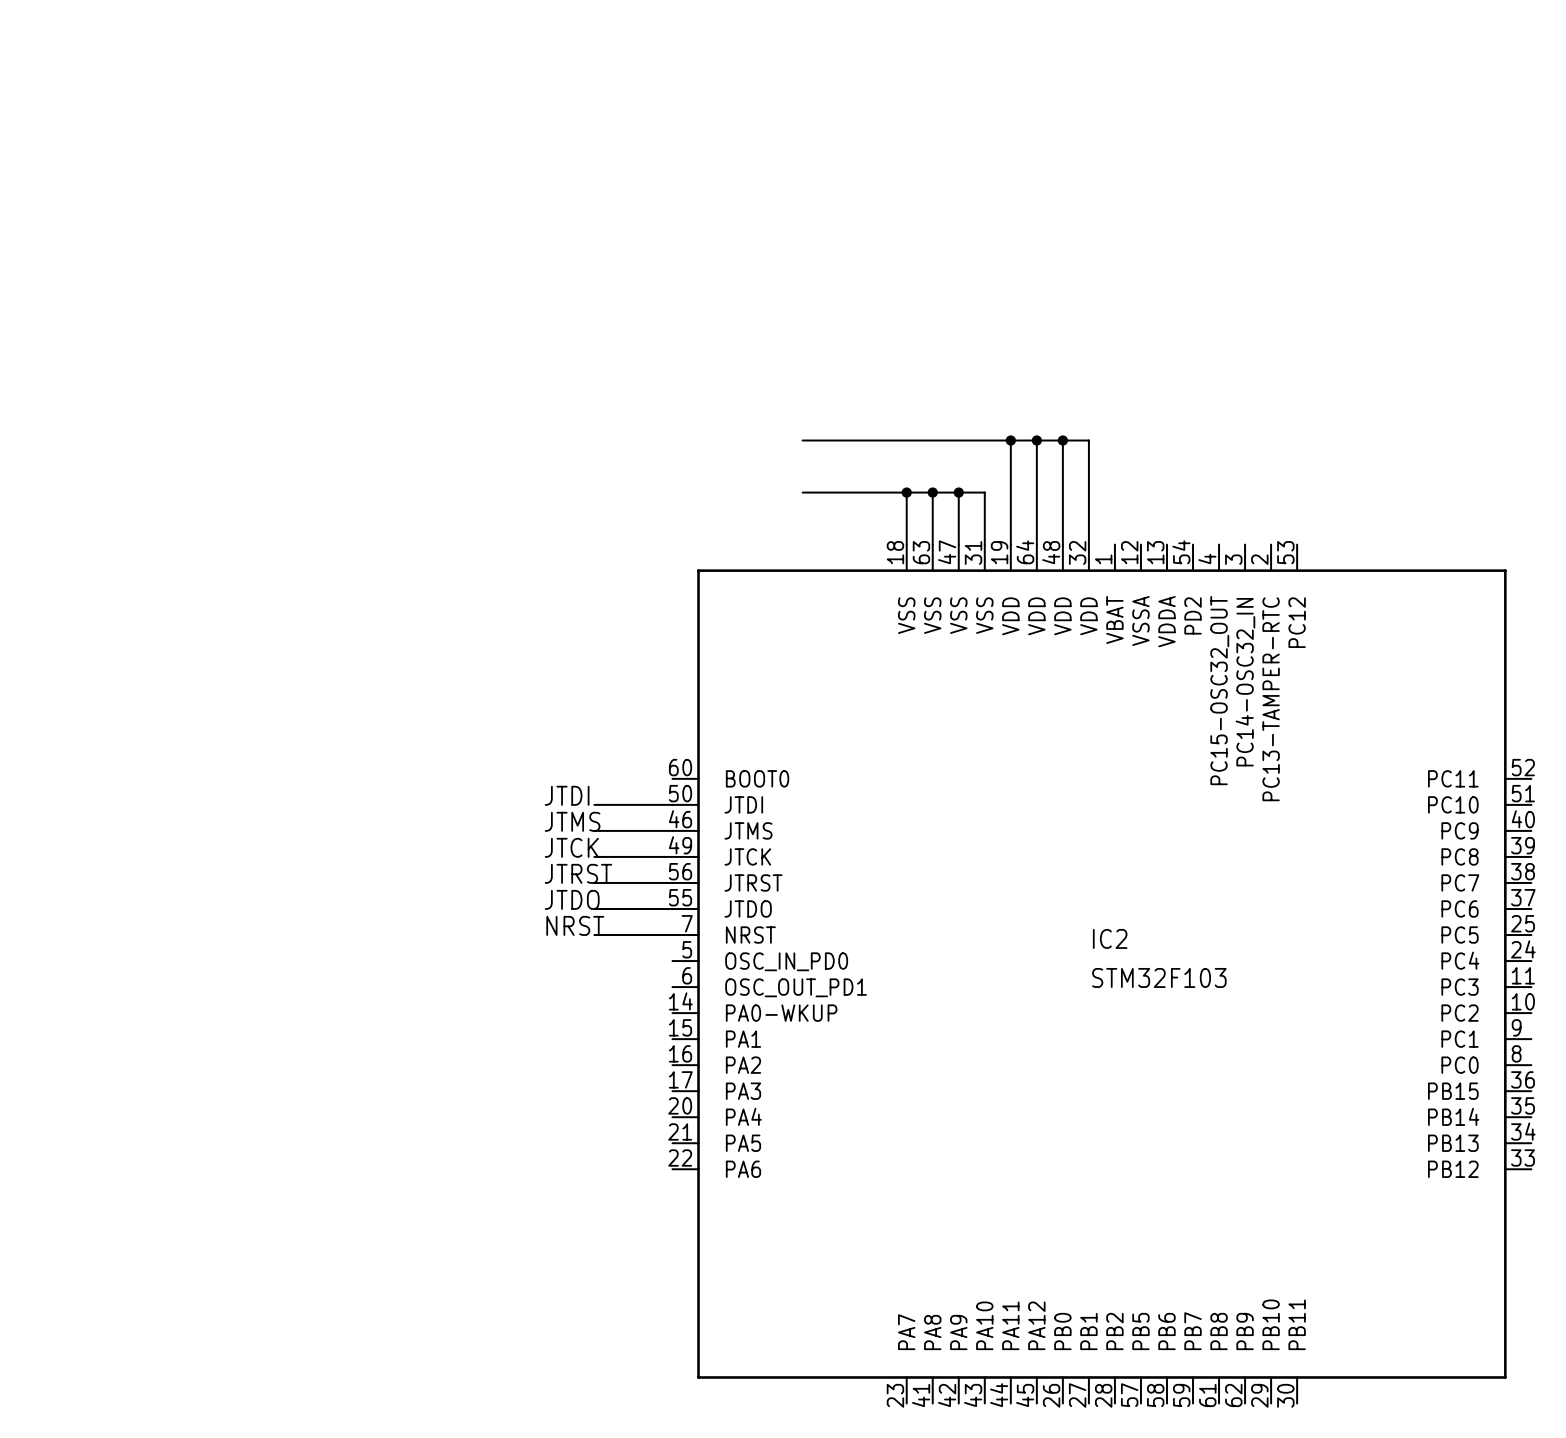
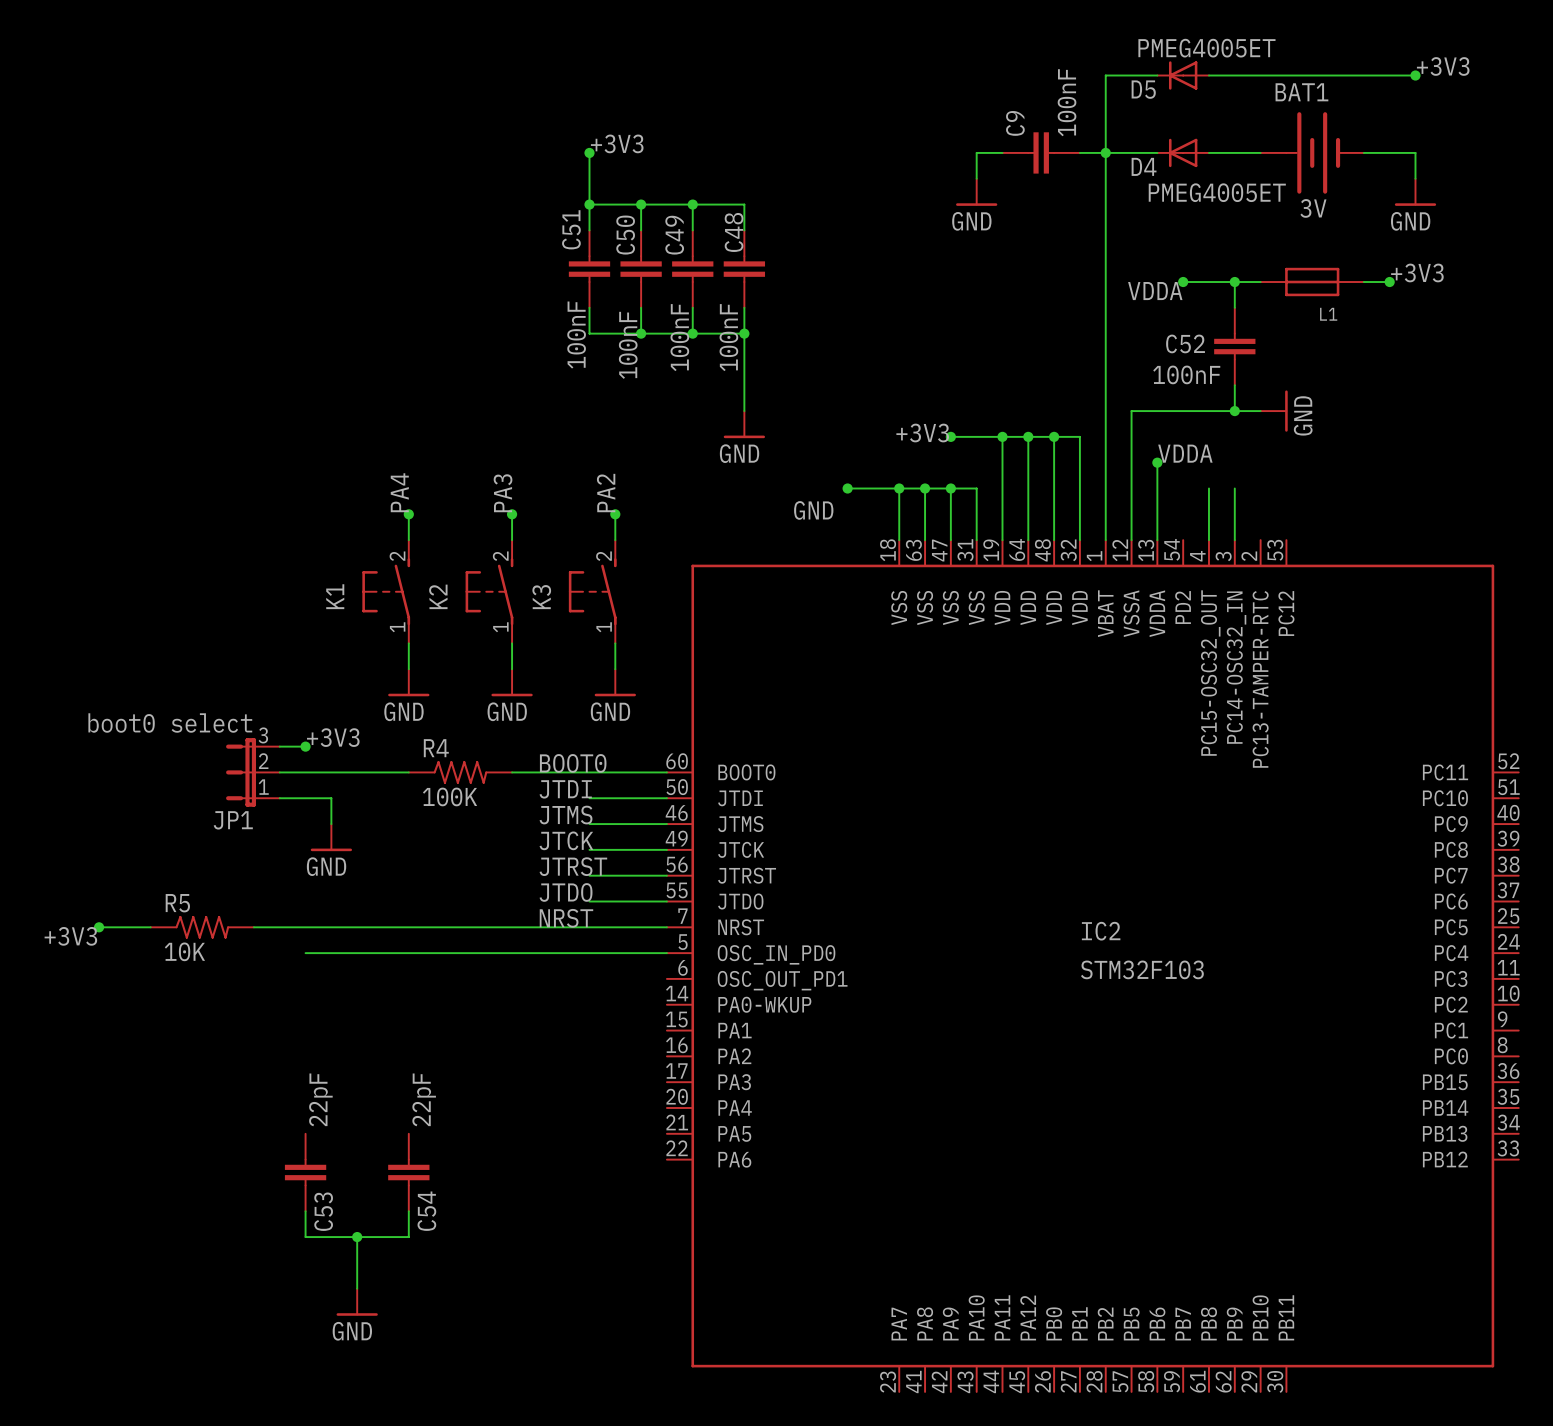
label: none -> +3V3 (1443, 66)
wire: none -> (1157, 75) (1105, 75) (1105, 540)
D5: none -> PMEG4005ET (1183, 75)
wire: none -> (1208, 75) (1415, 75)
junction: none -> (1415, 75)
label: none -> +3V3 (617, 143)
wire: none -> (589, 152) (589, 230)
junction: none -> (589, 152)
wire: none -> (1002, 152) (976, 152) (976, 178)
C9: none -> 100nF (1041, 152)
wire: none -> (1079, 152) (1157, 152)
junction: none -> (1105, 152)
D4: none -> PMEG4005ET (1183, 152)
wire: none -> (1208, 152) (1260, 152)
BAT1: none -> 3V (1312, 152)
wire: none -> (1363, 152) (1415, 152) (1415, 178)
power symbol: none -> GND (976, 192)
power symbol: none -> GND (1415, 192)
wire: none -> (589, 204) (744, 204) (744, 230)
junction: none -> (589, 204)
wire: none -> (641, 204) (641, 230)
junction: none -> (641, 204)
wire: none -> (692, 204) (692, 230)
junction: none -> (692, 204)
C51: none -> 100nF (589, 269)
C50: none -> 100nF (641, 269)
C49: none -> 100nF (692, 269)
C48: none -> 100nF (744, 269)
label: none -> +3V3 (1417, 272)
wire: none -> (1183, 282) (1260, 282)
junction: none -> (1183, 282)
wire: none -> (1234, 282) (1234, 307)
junction: none -> (1234, 282)
L1: none -> (1312, 282)
wire: none -> (1363, 282) (1389, 282)
junction: none -> (1389, 282)
label: none -> VDDA (1155, 291)
wire: none -> (589, 307) (589, 333) (744, 333)
wire: none -> (641, 307) (641, 333)
wire: none -> (692, 307) (692, 333)
wire: none -> (744, 307) (744, 411)
junction: none -> (641, 333)
junction: none -> (692, 333)
junction: none -> (744, 333)
C52: none -> 100nF (1234, 346)
wire: none -> (1234, 385) (1234, 411)
junction: none -> (1234, 411)
wire: none -> (1260, 411) (1131, 411) (1131, 540)
power symbol: none -> GND (1274, 411)
power symbol: none -> GND (744, 424)
label: none -> +3V3 (922, 433)
wire: (802, 440) (958, 440) -> none
junction: none -> (950, 436)
label: none -> VDDA (1185, 453)
wire: none -> (1157, 462) (1157, 540)
junction: none -> (1157, 462)
wire: (802, 492) (854, 492) -> none
junction: none -> (847, 488)
wire: none -> (1208, 488) (1208, 540)
wire: none -> (1234, 488) (1234, 540)
label: none -> PA4 (399, 492)
label: none -> PA3 (503, 493)
label: none -> PA2 (606, 493)
label: none -> GND (813, 510)
wire: none -> (408, 514) (408, 540)
junction: none -> (408, 514)
wire: none -> (512, 514) (512, 540)
junction: none -> (512, 514)
wire: none -> (615, 514) (615, 540)
junction: none -> (615, 514)
K1: none -> (386, 591)
K2: none -> (489, 591)
K3: none -> (592, 591)
wire: none -> (408, 643) (408, 669)
wire: none -> (512, 643) (512, 669)
wire: none -> (615, 643) (615, 669)
power symbol: none -> GND (408, 682)
power symbol: none -> GND (512, 682)
power symbol: none -> GND (615, 682)
label: none -> +3V3 (333, 737)
wire: none -> (279, 746) (305, 746)
junction: none -> (305, 746)
label: none -> BOOT0 (573, 763)
JP1: none -> boot0 select (252, 772)
wire: none -> (279, 772) (408, 772)
R4: none -> 100K (460, 772)
wire: none -> (512, 772) (666, 772)
wire: none -> (279, 798) (331, 798) (331, 824)
power symbol: none -> GND (331, 837)
wire: none -> (99, 927) (150, 927)
junction: none -> (99, 927)
R5: none -> 10K (202, 927)
wire: none -> (253, 927) (589, 927)
label: none -> +3V3 (70, 936)
wire: none -> (305, 953) (666, 953)
C53: none -> 22pF (305, 1172)
C54: none -> 22pF (408, 1172)
wire: none -> (305, 1211) (305, 1237) (408, 1237) (408, 1211)
wire: none -> (357, 1237) (357, 1288)
junction: none -> (357, 1237)
power symbol: none -> GND (357, 1302)

